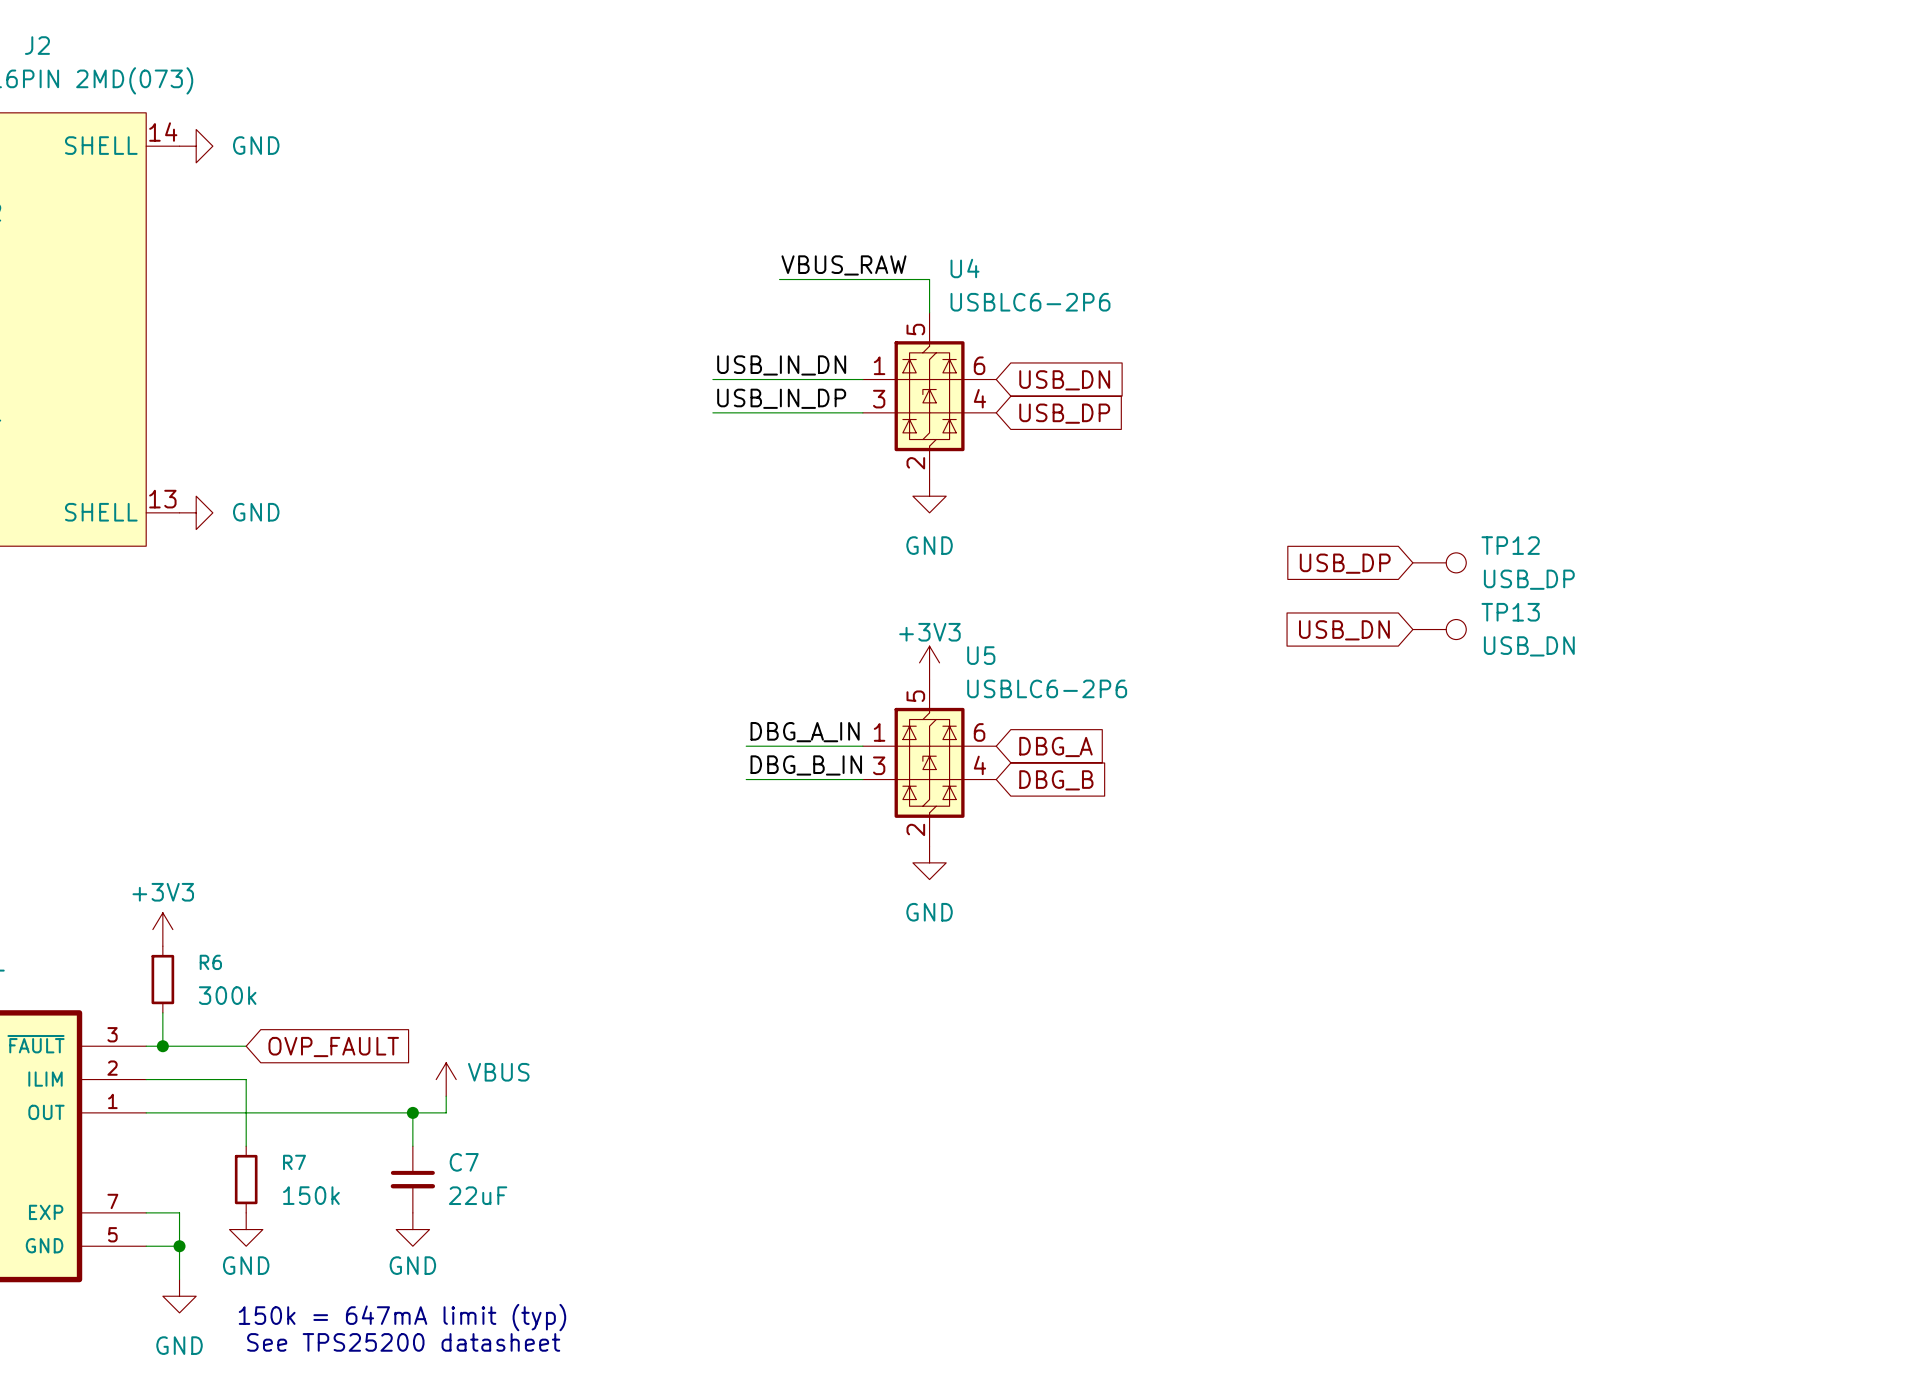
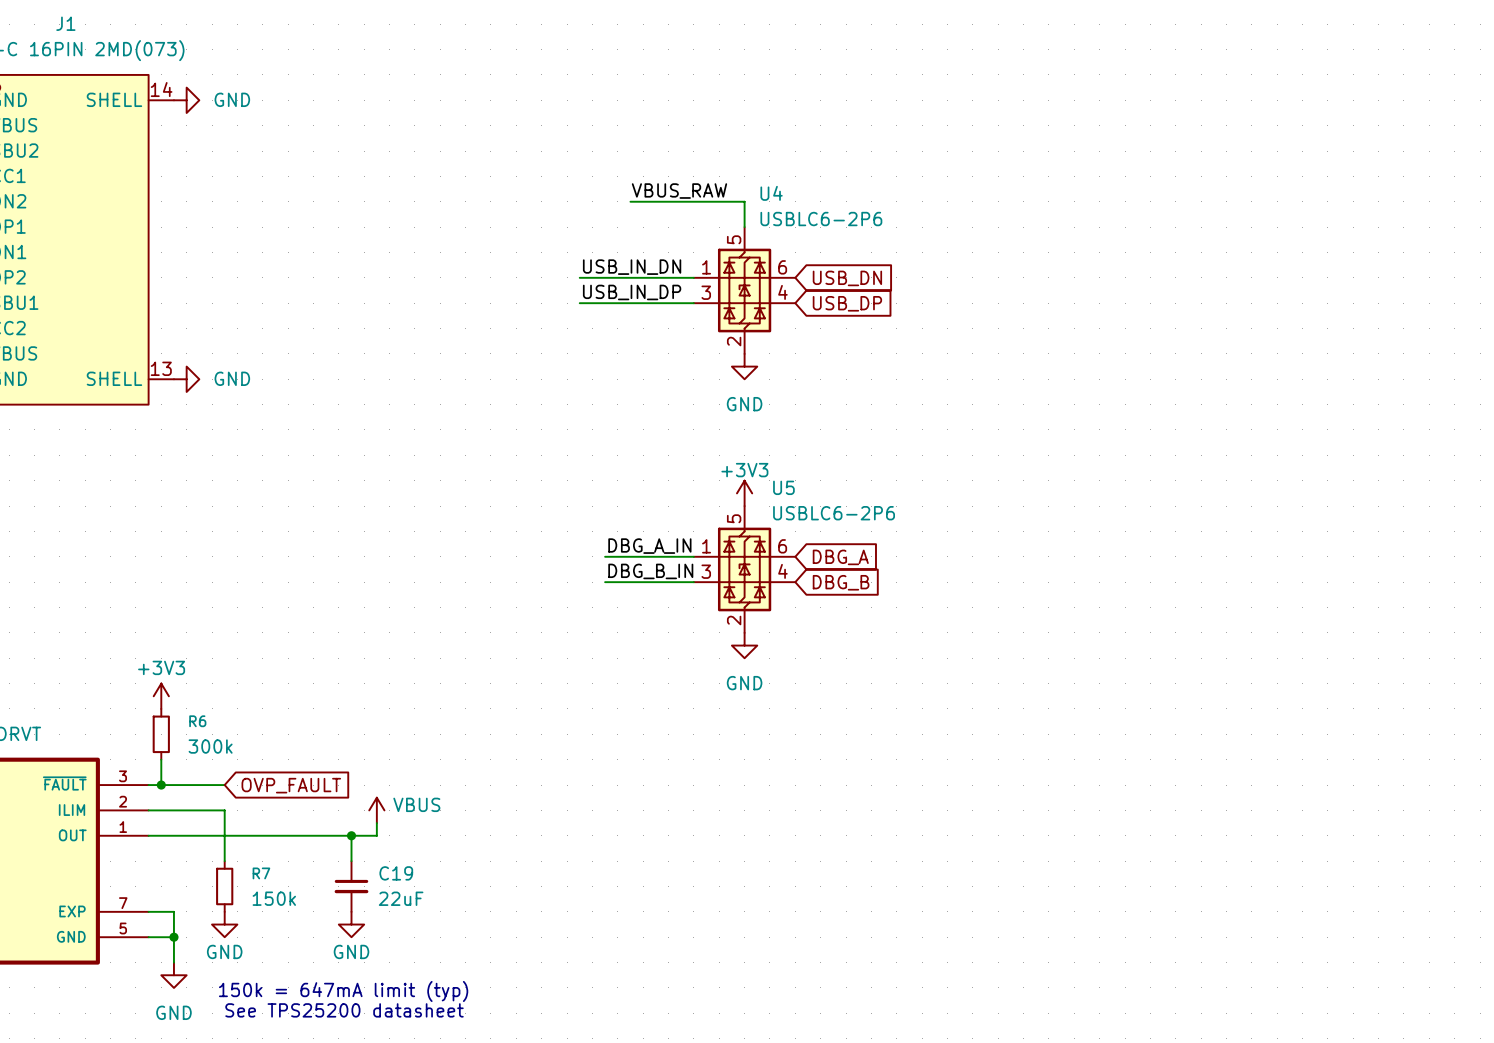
J2 name: J2 (37, 45) -> J1 (65, 23)
TP12: USB_DP (1439, 562) -> none
global label: USB_DP (1345, 563) -> none
TP13: USB_DN (1439, 629) -> none
global label: USB_DN (1344, 630) -> none
C7 name: C7 (464, 1162) -> C19 (396, 873)

